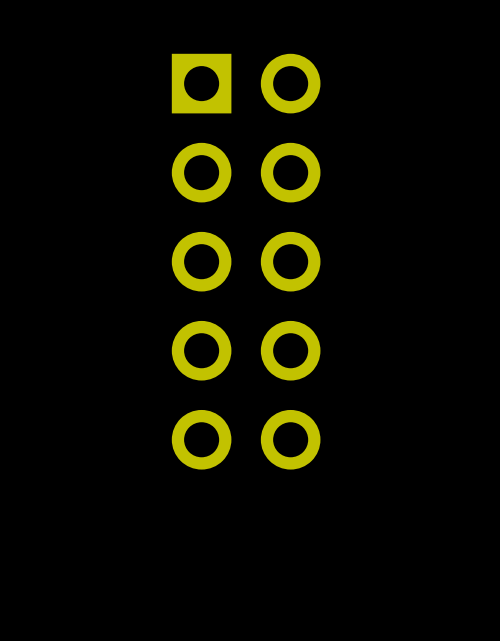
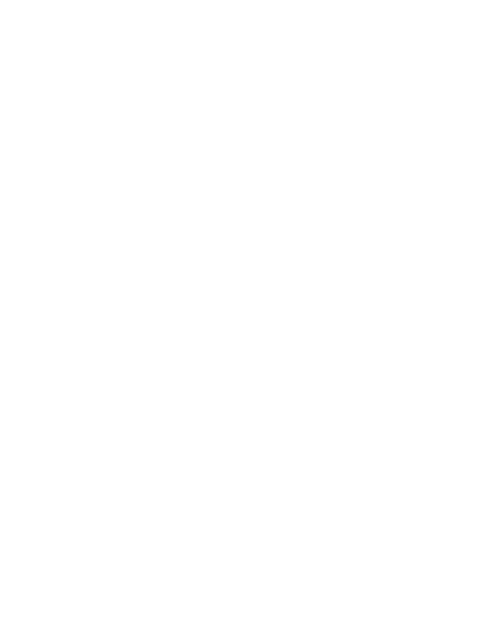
part: (246, 261) -> none

